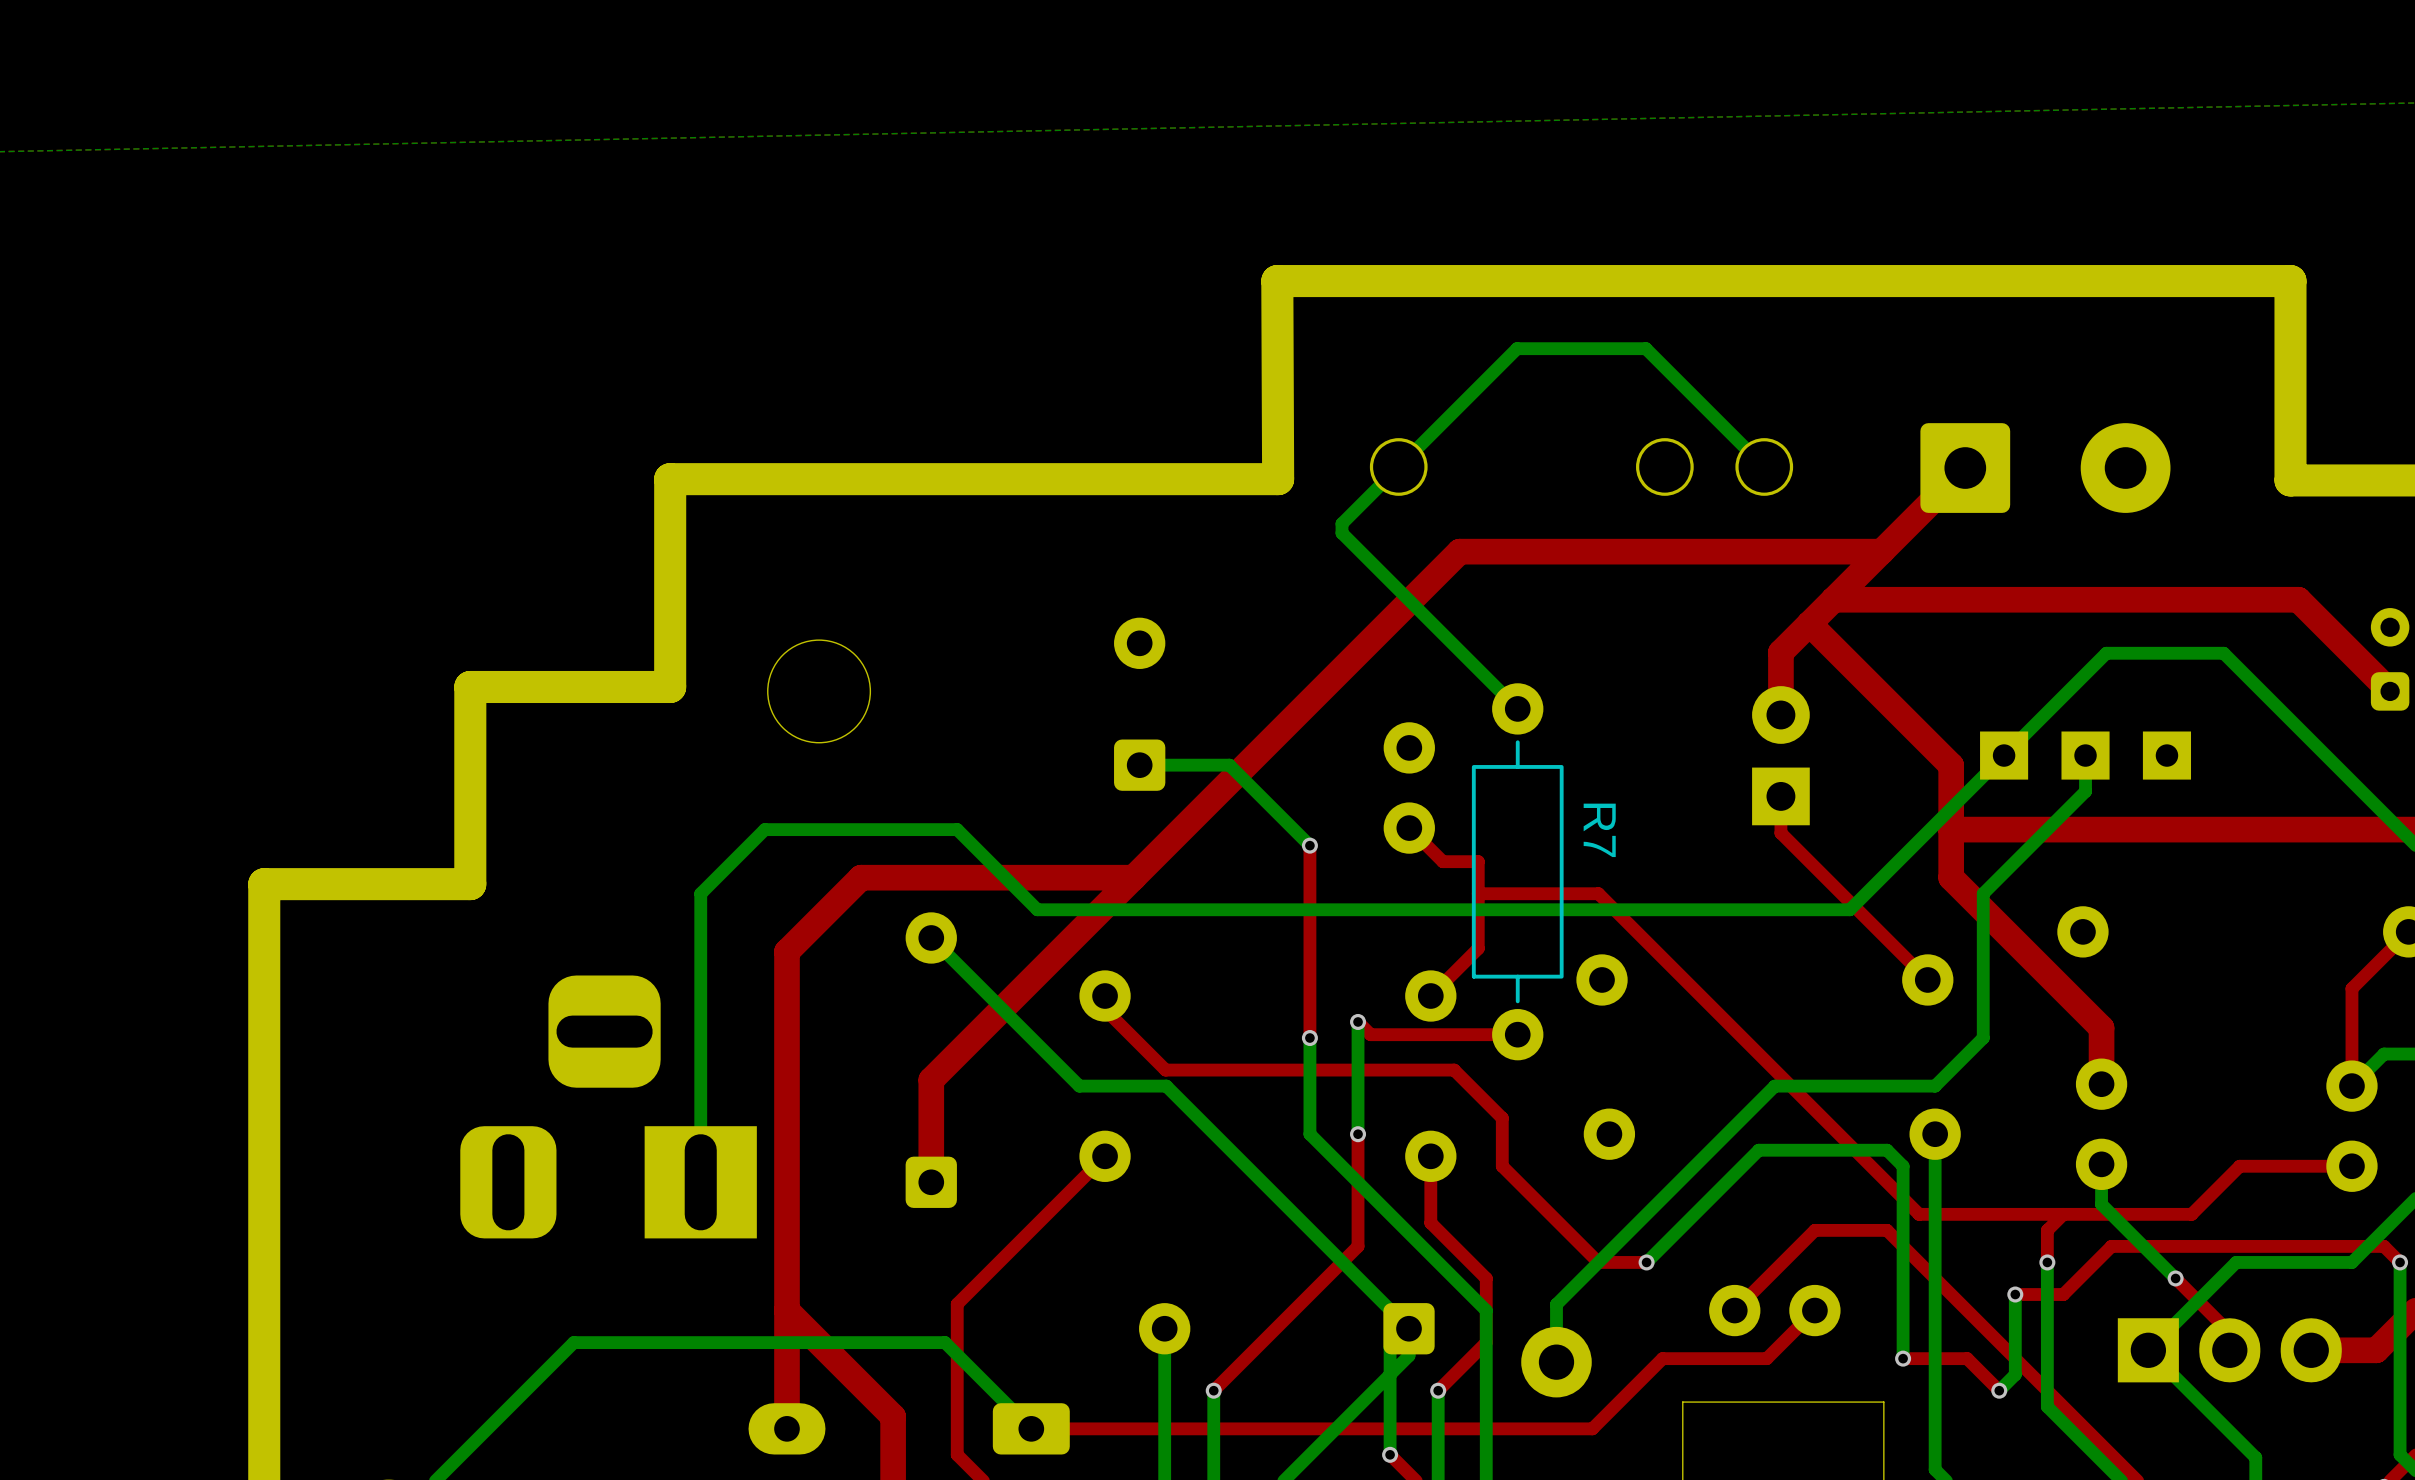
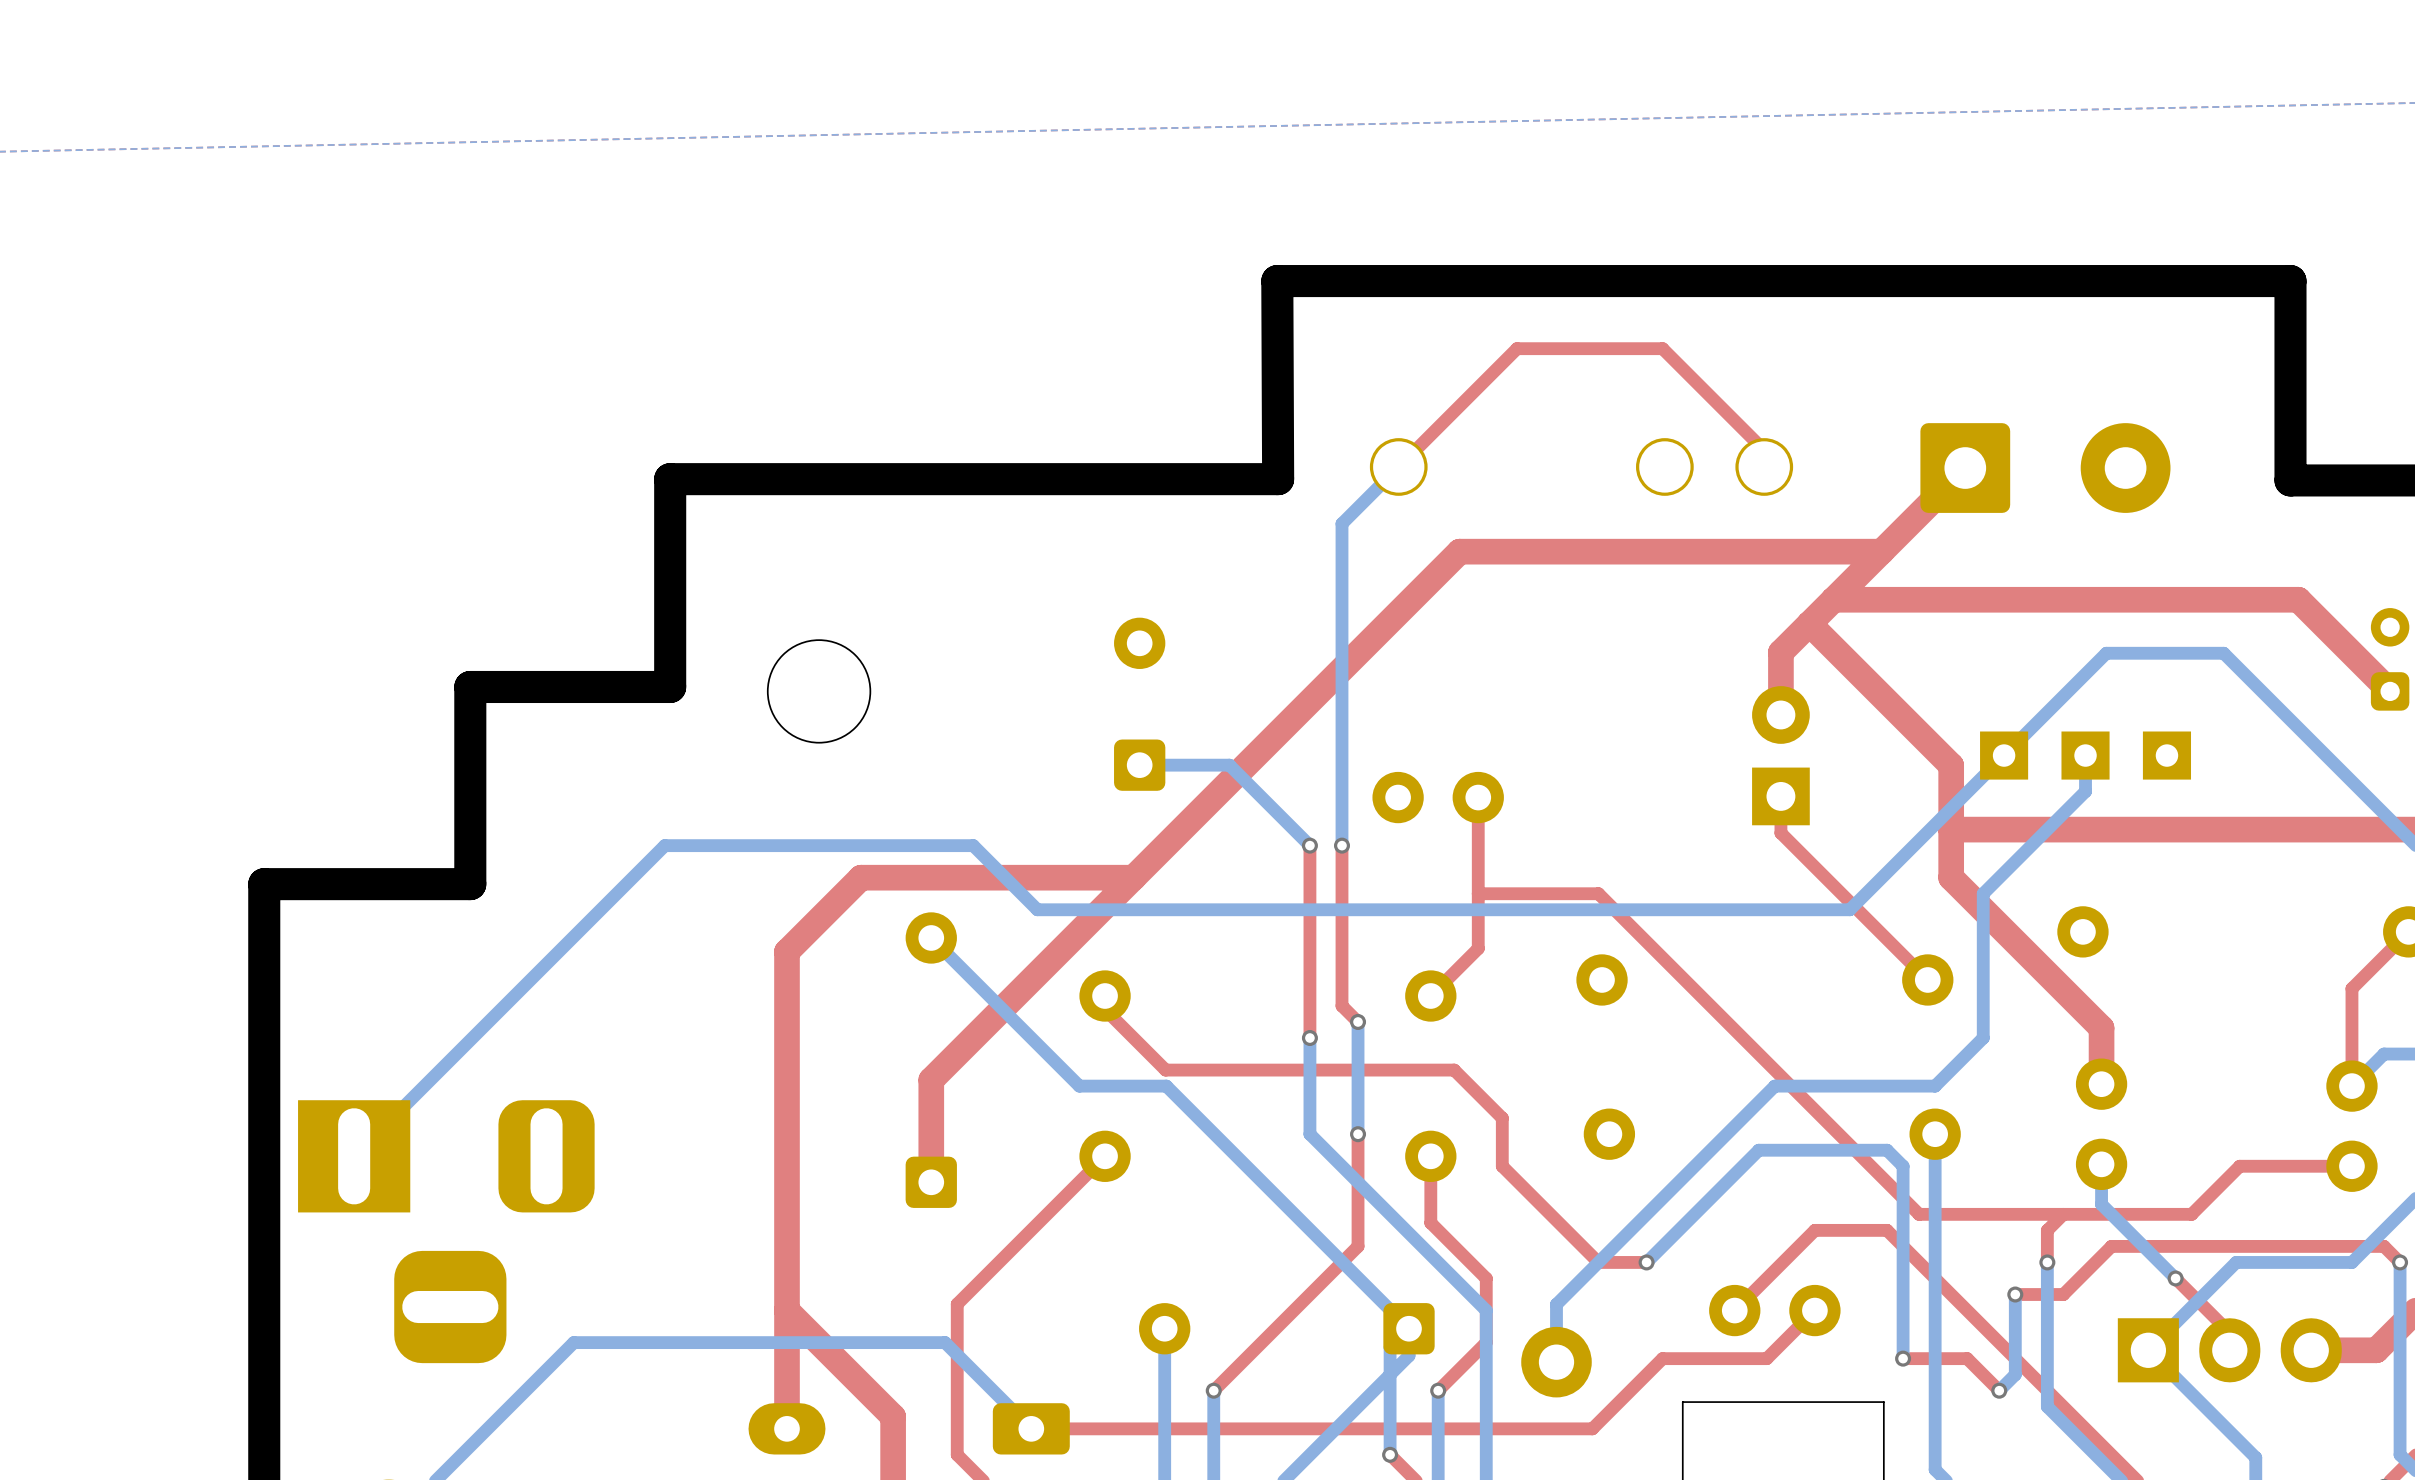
top track: none -> (1764, 450) (1662, 348) (1517, 348) (1398, 466)
bottom track: (1764, 466) (1645, 348) (1517, 348) (1398, 466) -> none
bottom track: (1341, 533) (1517, 708) -> (1341, 533) (1341, 845)
part rotation: 0° (1409, 787) -> 90° clockwise (1438, 797)
top track: (1409, 828) (1442, 861) (1478, 861) -> (1478, 797) (1478, 861)
bottom track: (973, 845) (957, 829) (764, 829) (700, 893) (700, 1182) -> (973, 845) (664, 845) (354, 1156)
via: none -> (1341, 845)
R7: (1517, 871) -> none
top track: (1358, 1021) (1370, 1034) (1517, 1034) -> (1358, 1021) (1341, 1005) (1341, 845)
part rotation: 0° (608, 1106) -> 180° (446, 1231)
part position: (608, 1106) -> (446, 1231)

